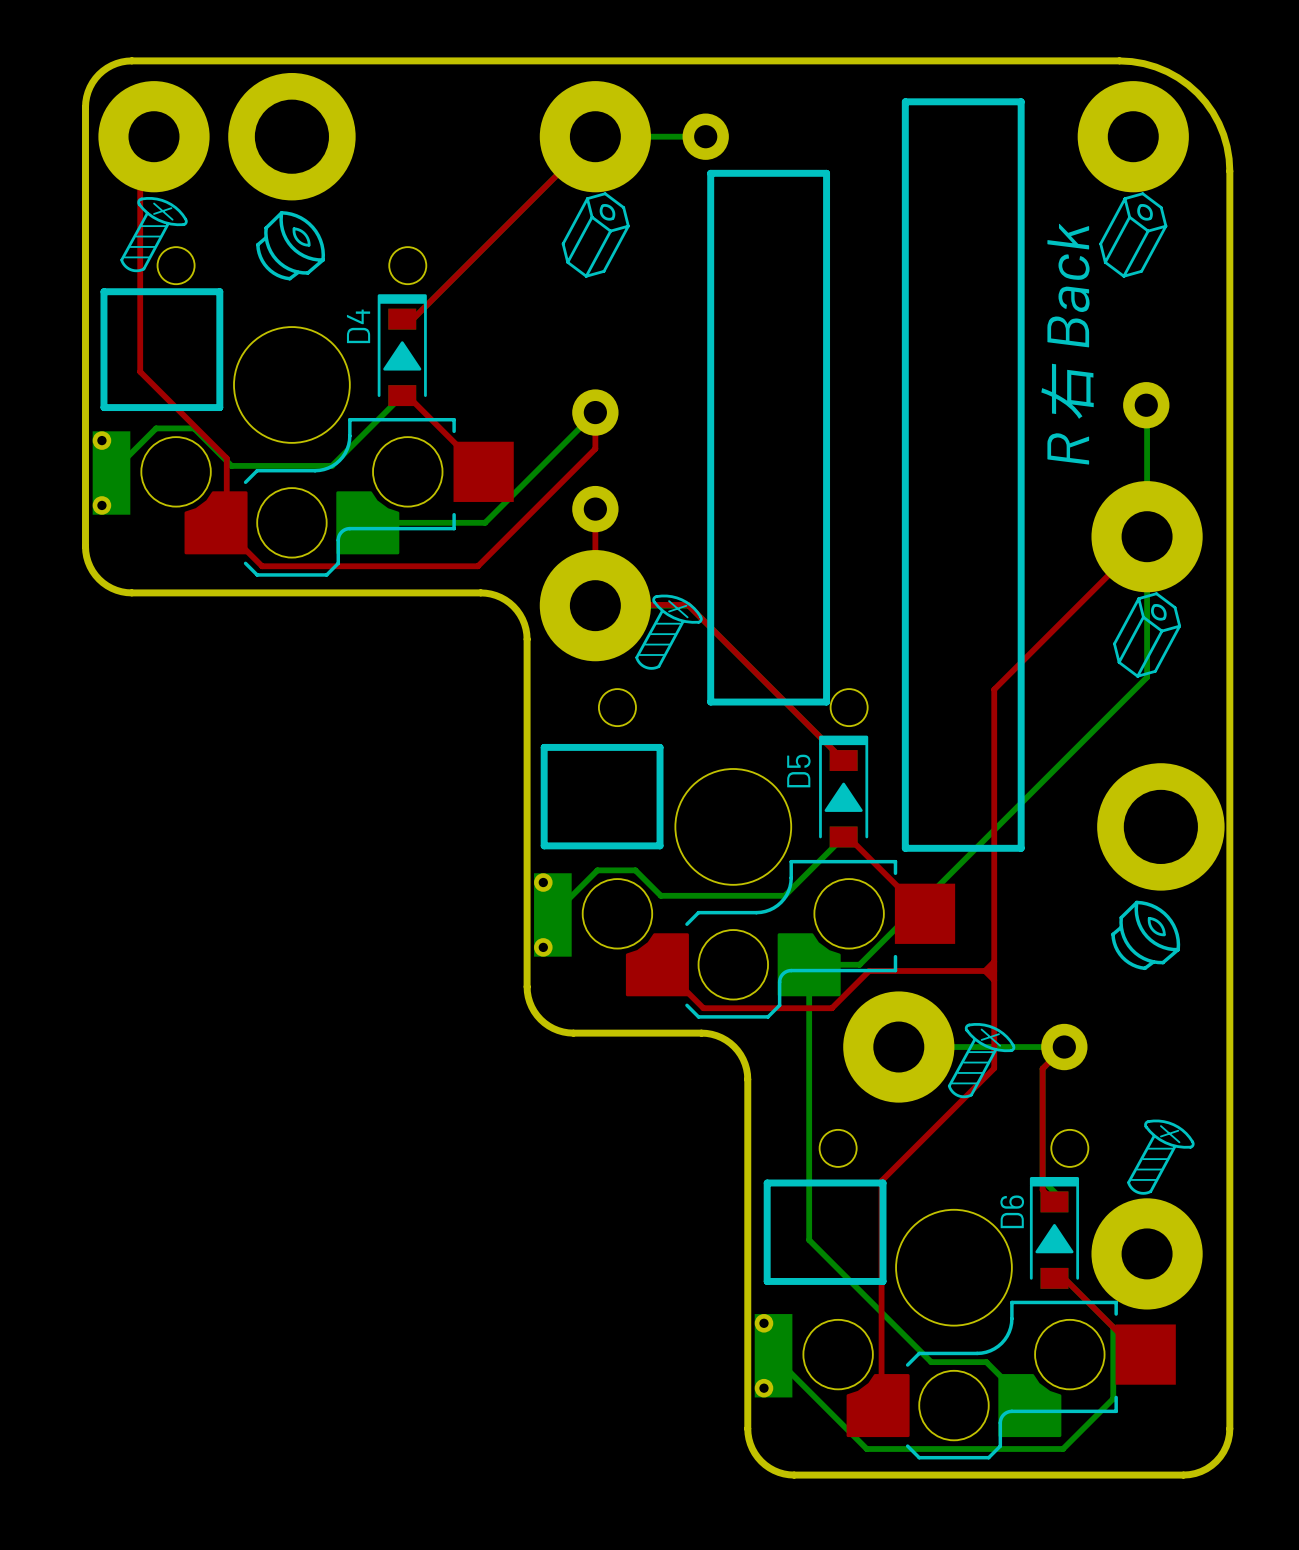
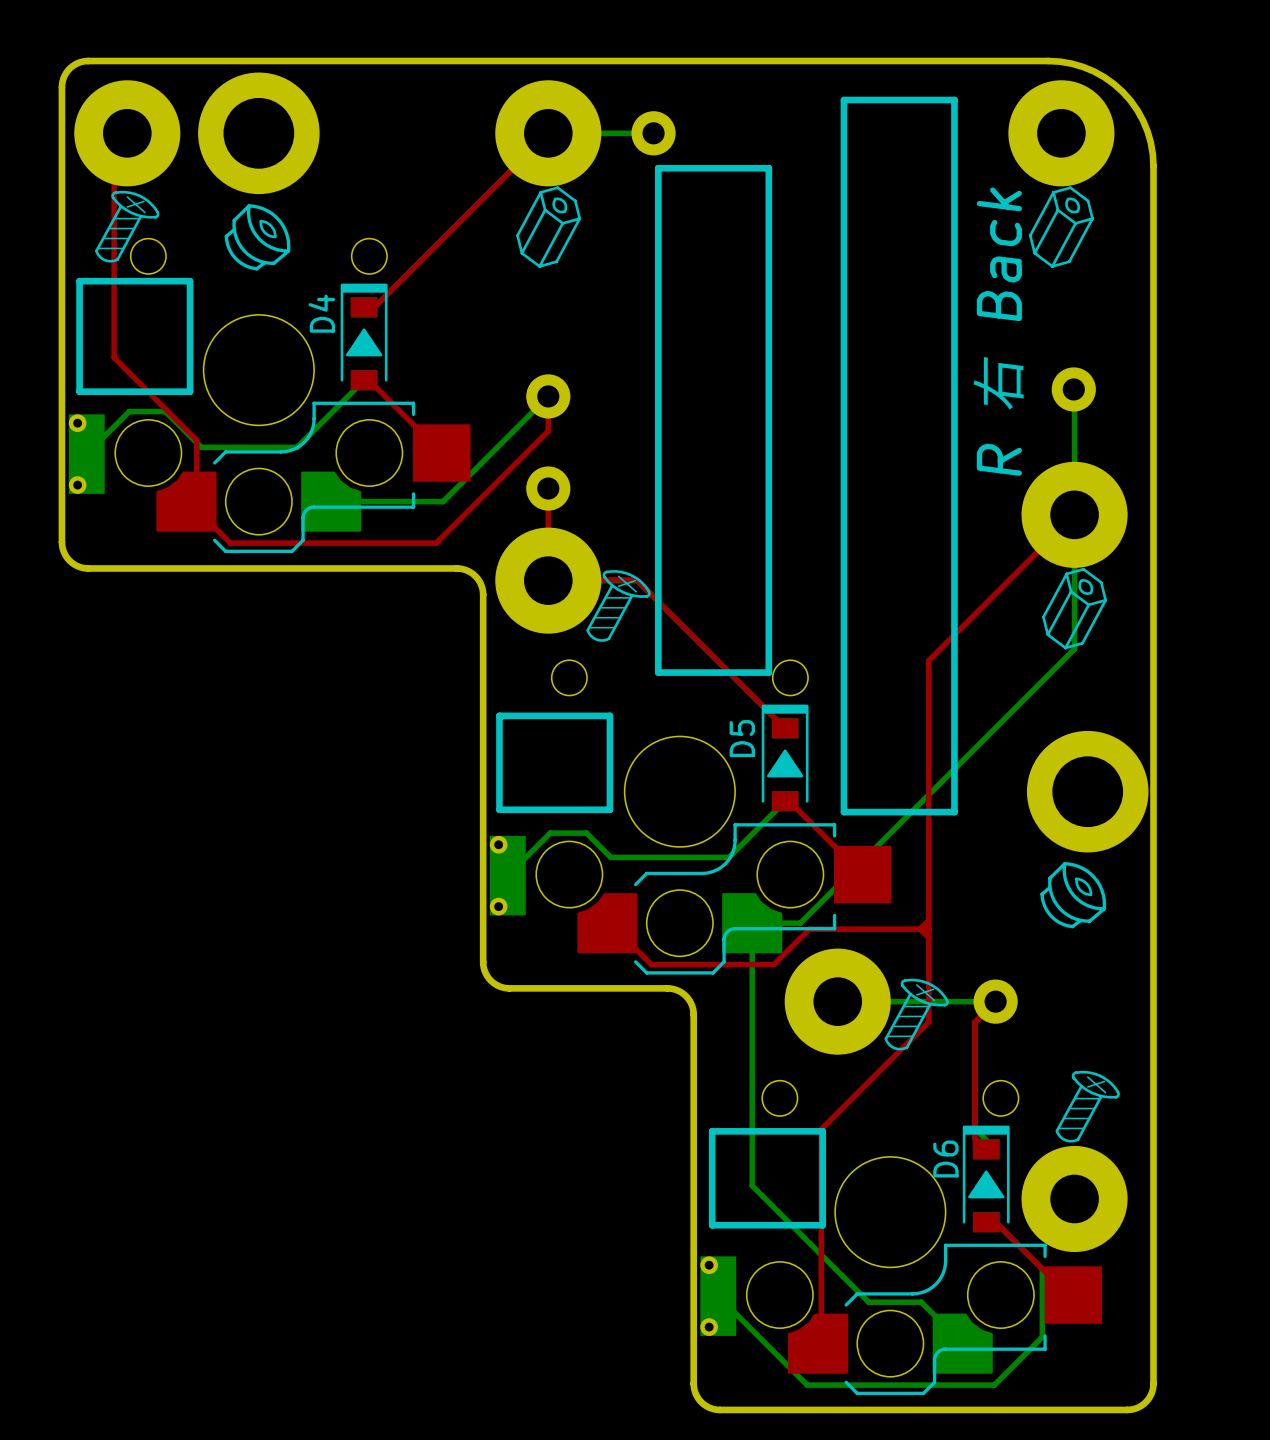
drawing shape: [82, 57, 1234, 1479] -> [58, 57, 1157, 1414]

